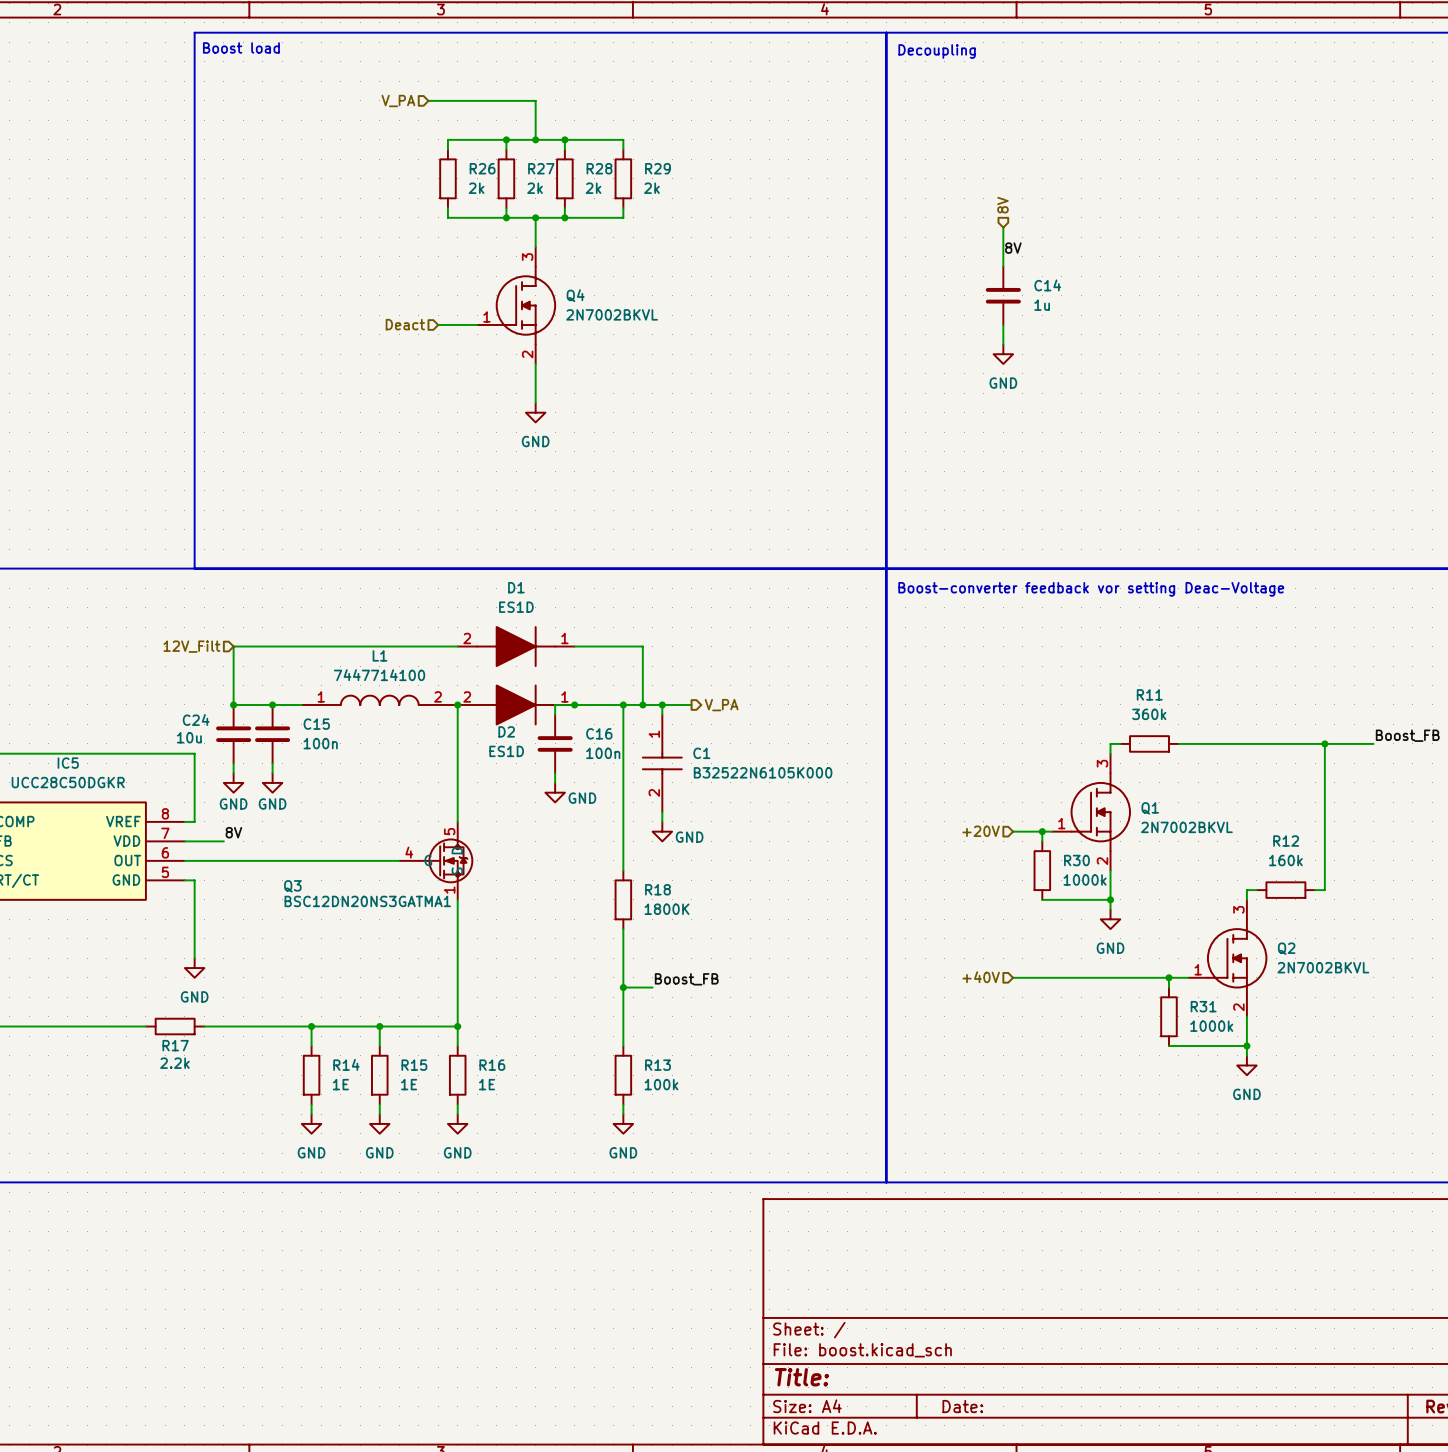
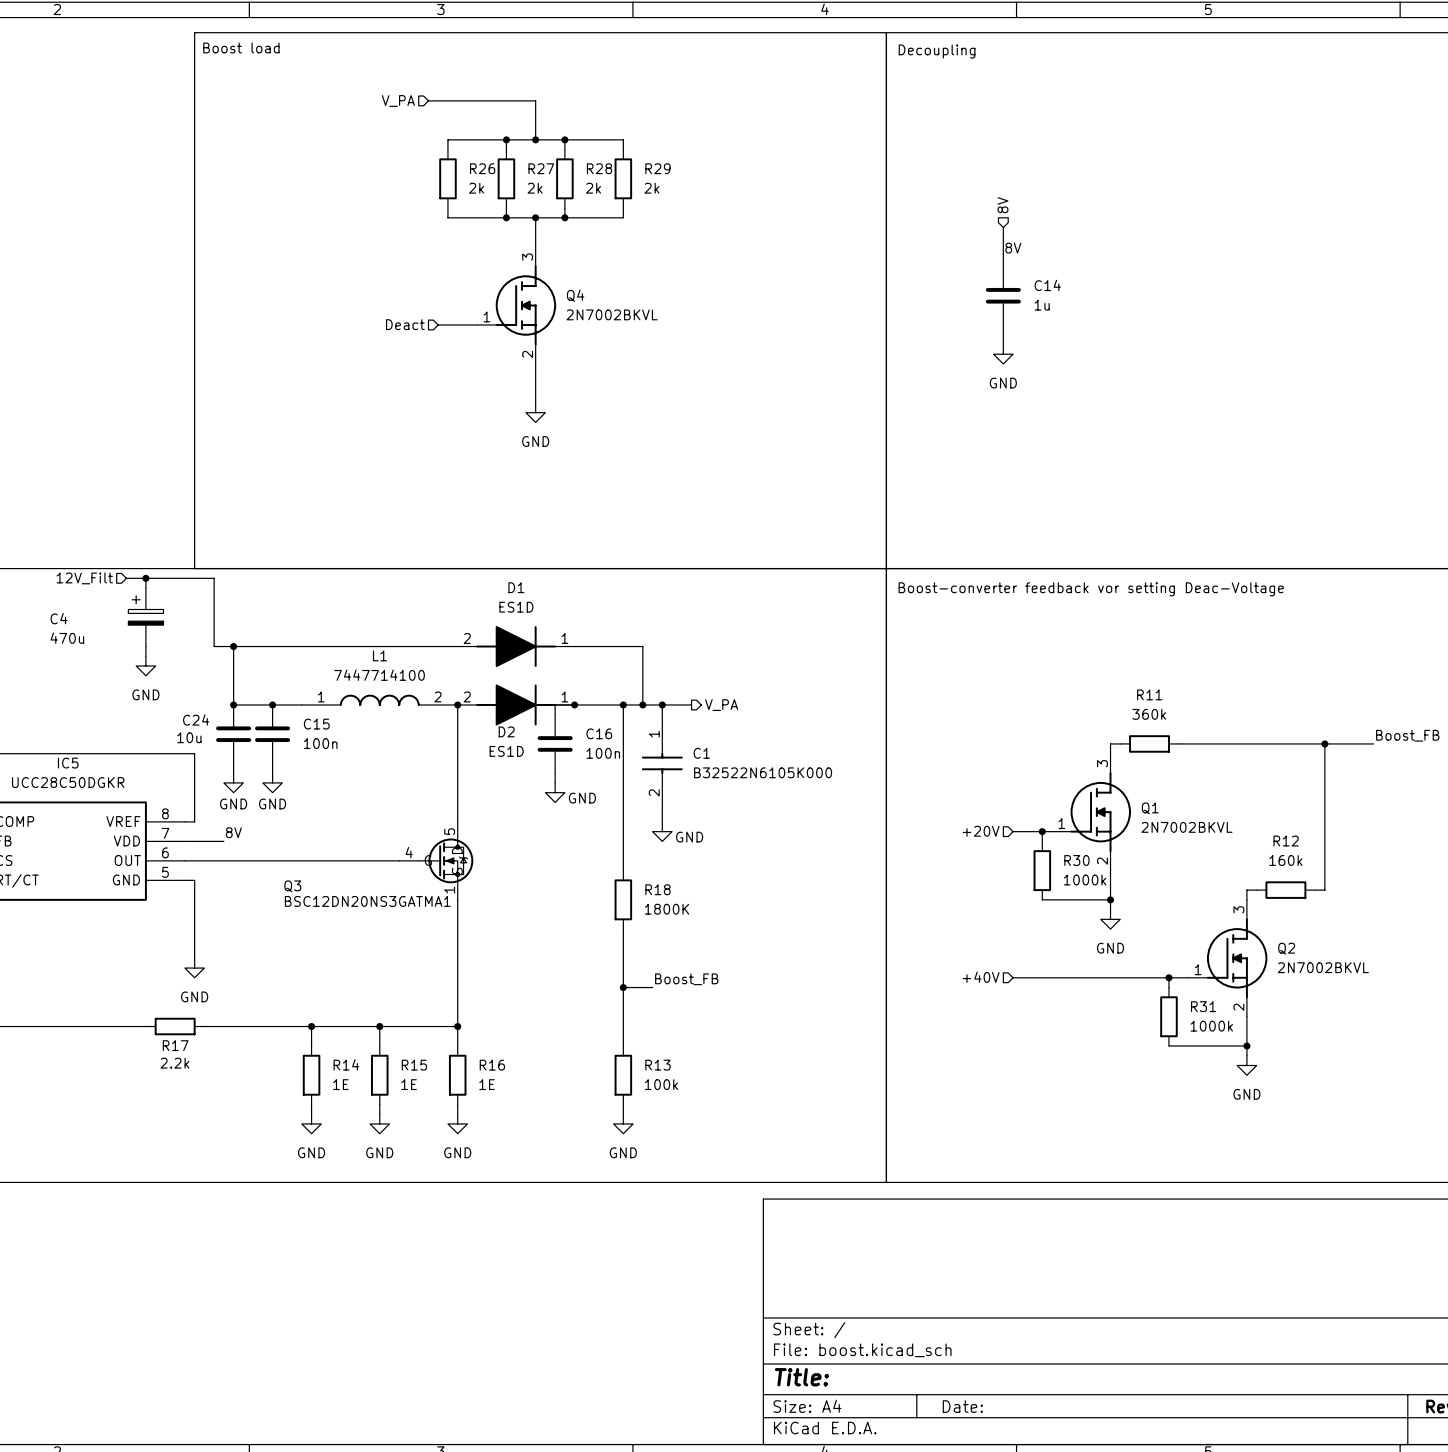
wire: none -> (126, 578) (214, 578) (214, 646) (233, 646)
wire: none -> (145, 578) (145, 588)
junction: none -> (145, 578)
C4: none -> 470u (145, 617)
wire: none -> (145, 646) (145, 656)
hierarchical label position: 12V_Filt (191, 646) -> 12V_Filt (84, 578)
junction: none -> (233, 646)
power symbol: none -> GND (145, 666)

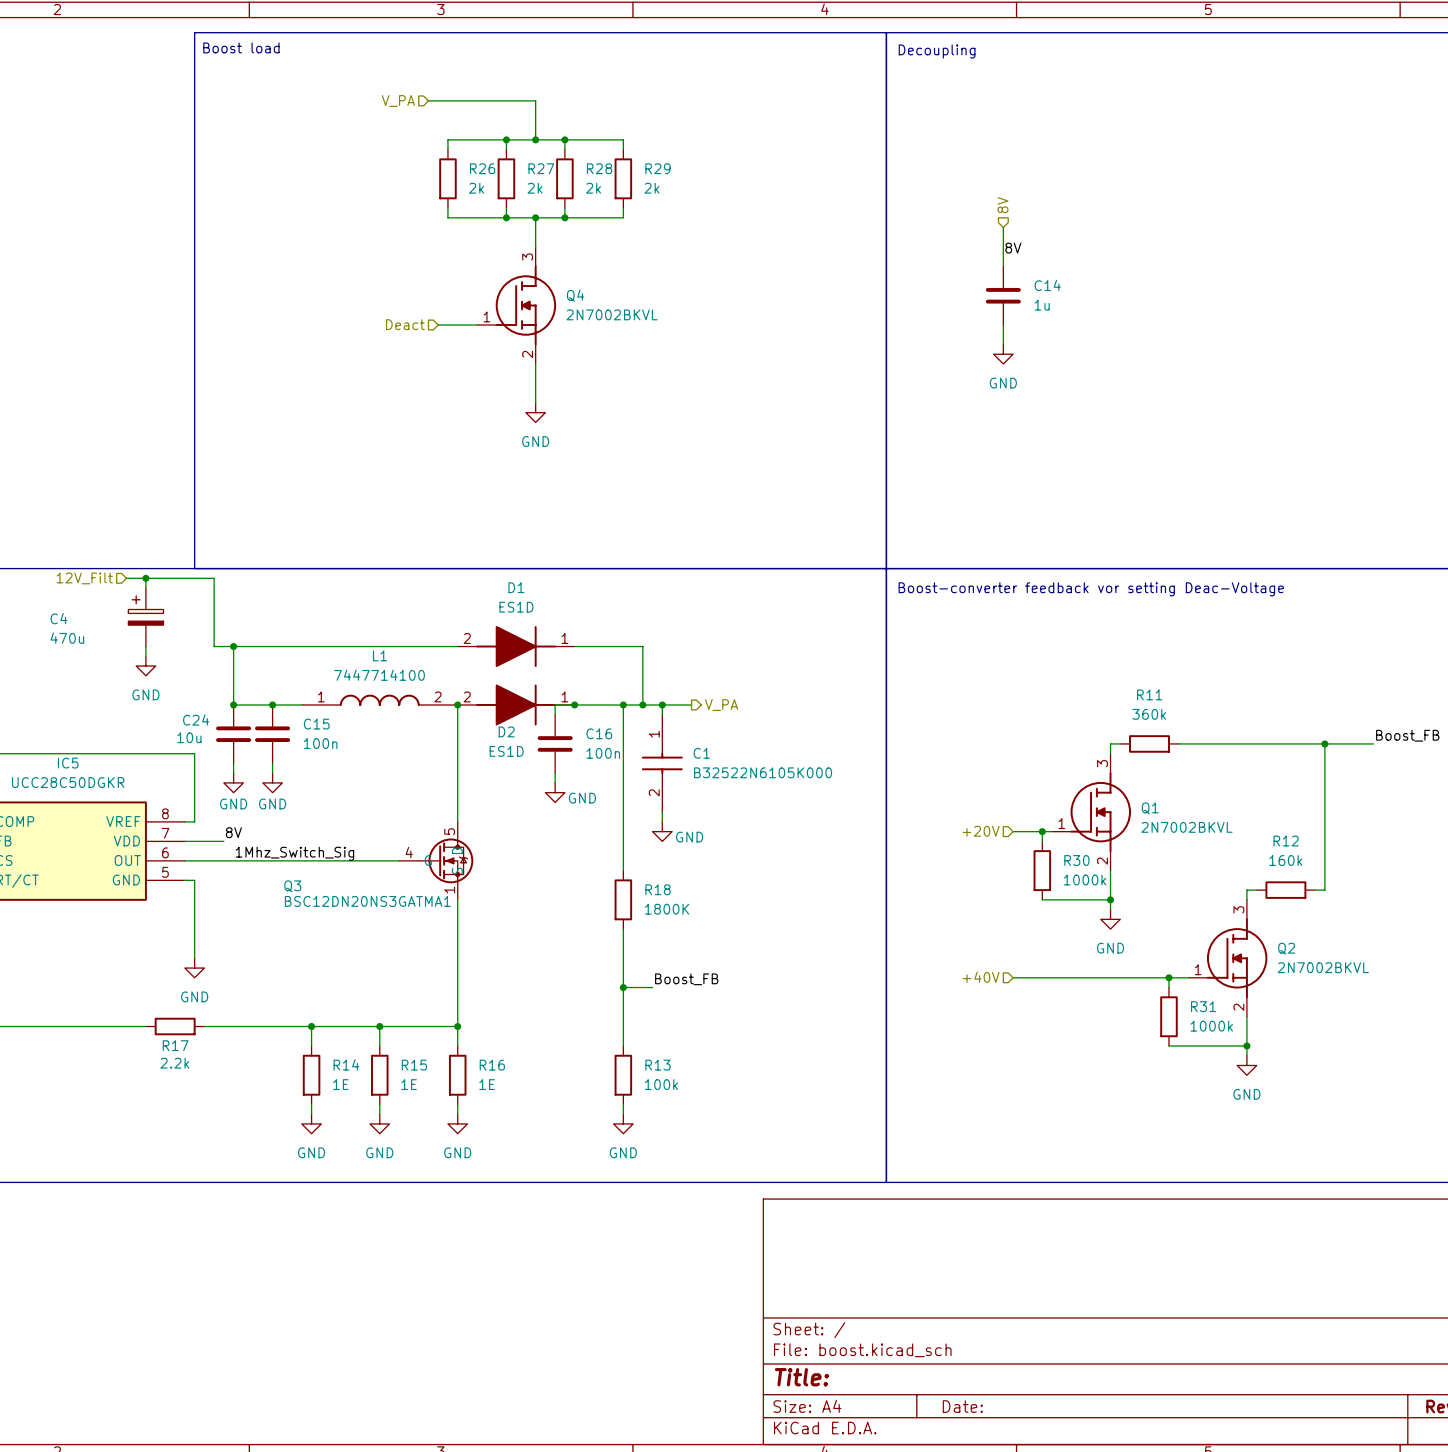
label: none -> 1Mhz_Switch_Sig (294, 853)

